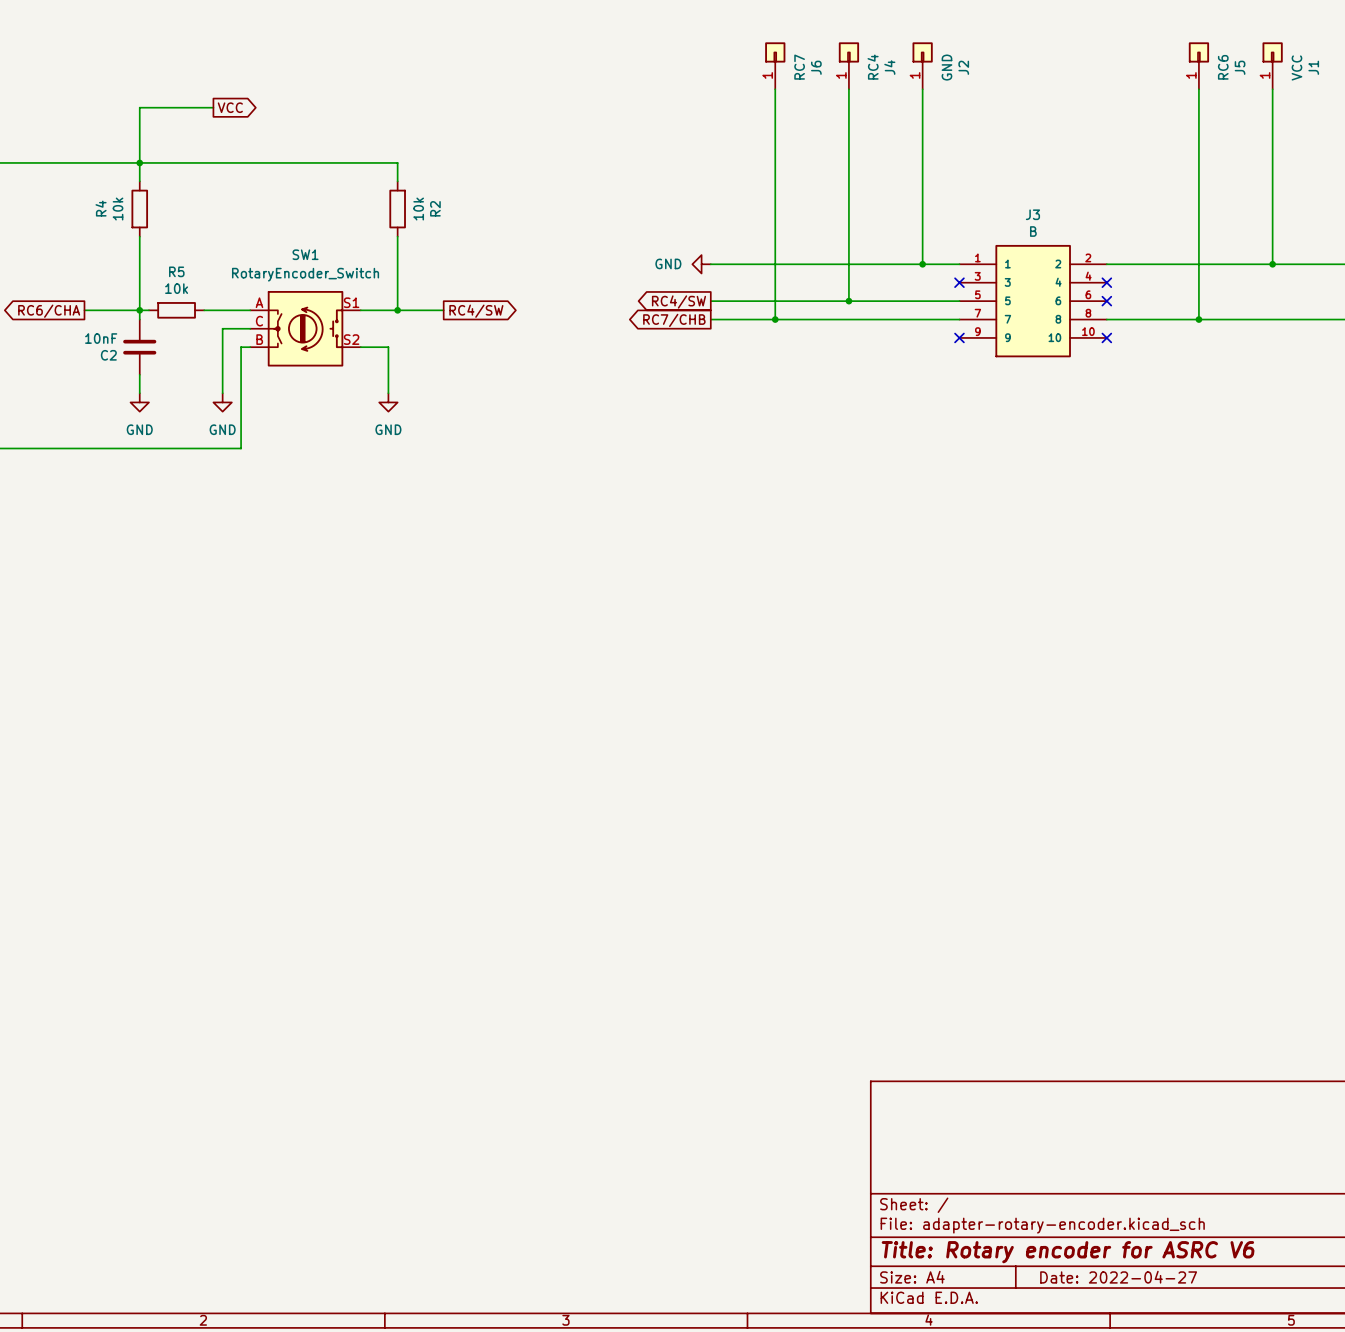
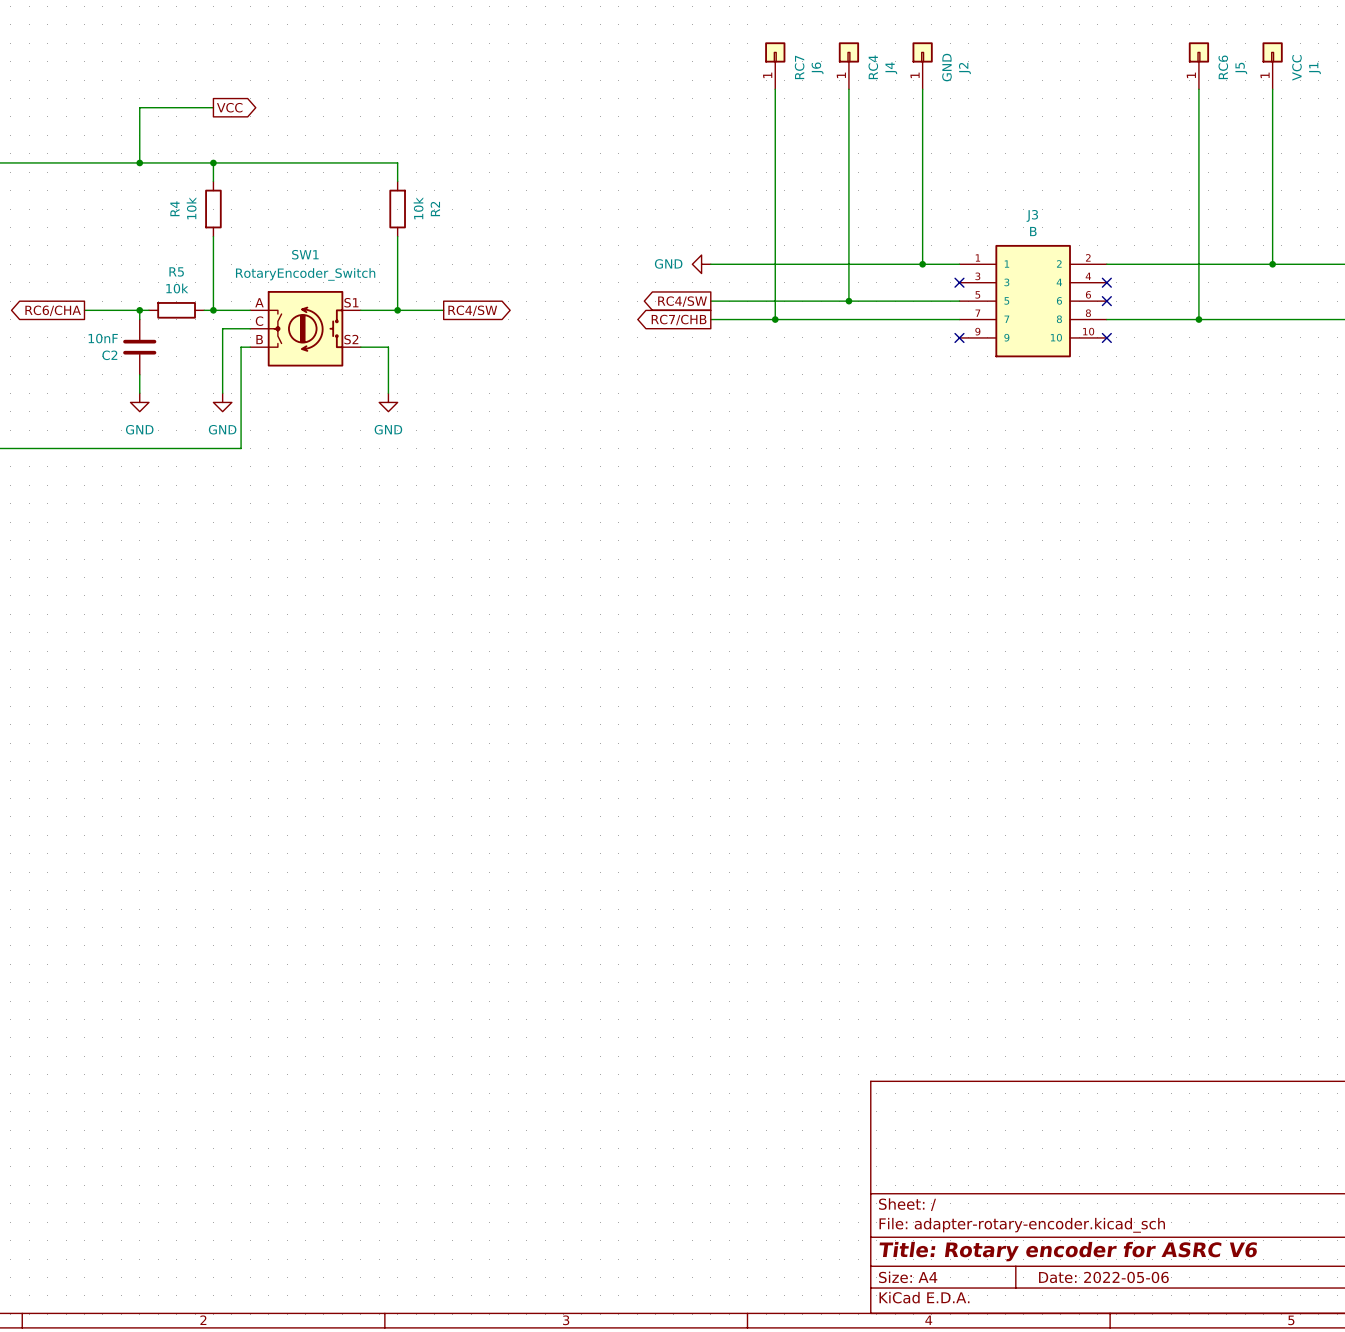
wire: (139, 162) (139, 181) -> (213, 162) (213, 181)
junction: none -> (213, 162)
R4 position: (139, 209) -> (213, 209)
wire: (139, 236) (139, 310) -> (213, 236) (213, 310)
junction: none -> (213, 310)
title block: Date: 2022-04-27 (1118, 1277) -> Date: 2022-05-06 (1103, 1277)

